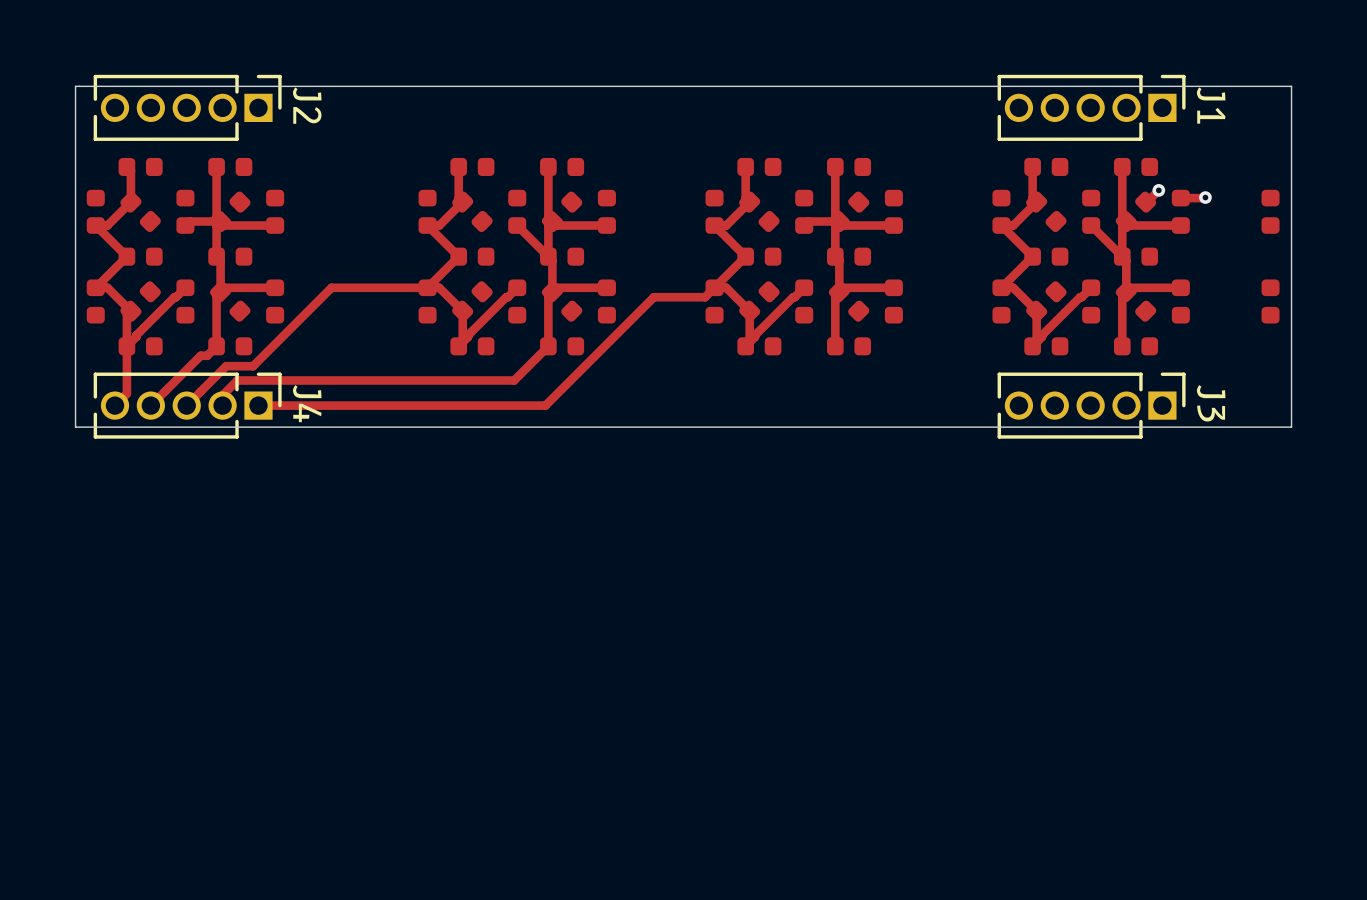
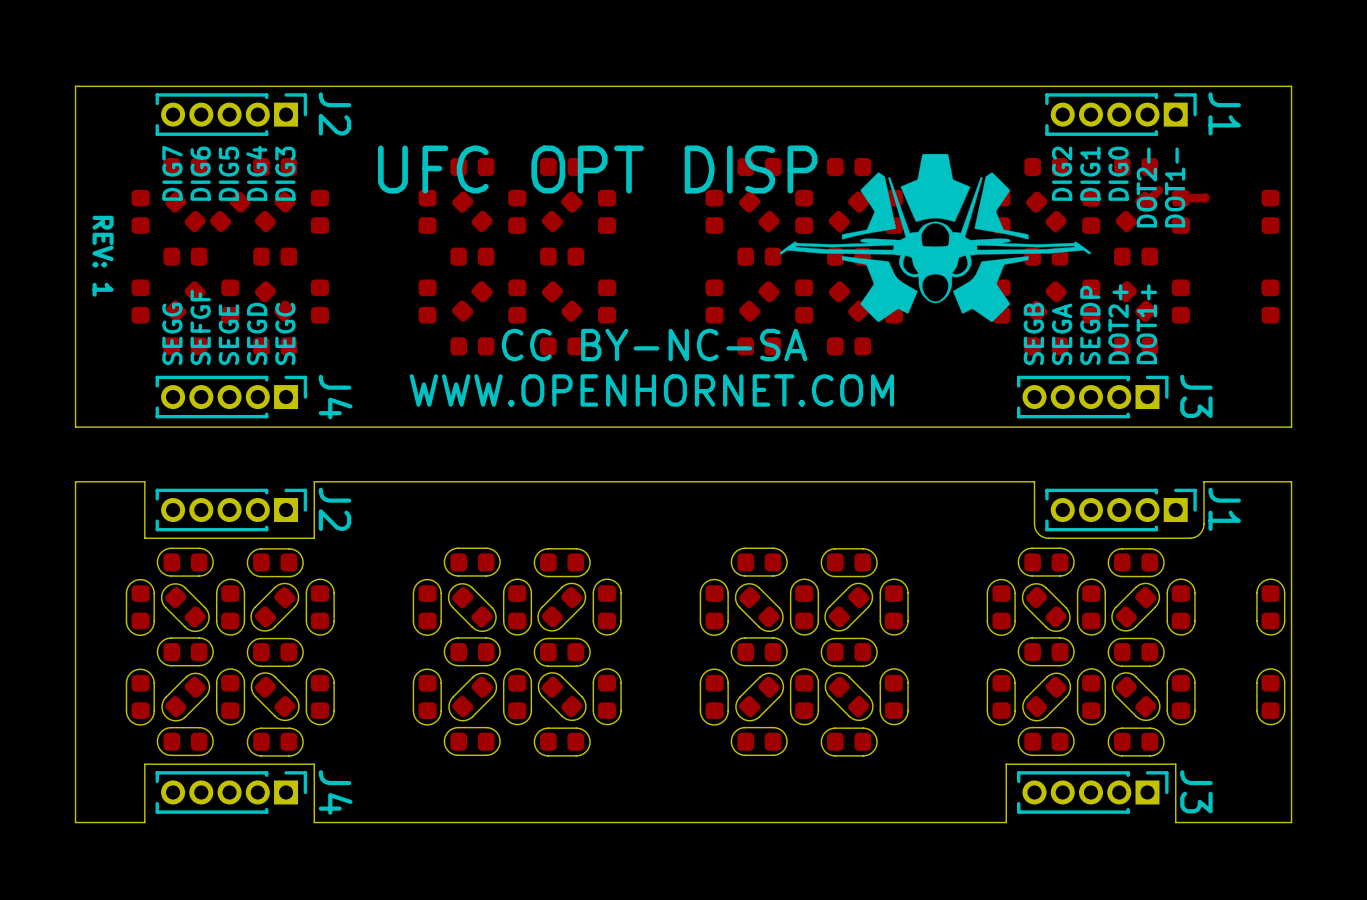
J2: (187, 107) -> none
J1: (1091, 107) -> none
J2: none -> (231, 114)
J1: none -> (1121, 114)
drawing: none -> [779, 153, 1091, 322]
top track: (126, 166) (130, 170) (130, 202) (107, 225) (95, 225) (126, 256) (95, 287) (107, 287) (130, 311) (126, 315) (126, 393) (114, 405) -> none
part: (140, 166) -> none
part: none -> (185, 166)
top track: (216, 166) (216, 217) (224, 225) (275, 225) -> none
part: (230, 166) -> none
part: none -> (275, 166)
top track: (458, 166) (458, 198) (462, 202) (439, 225) (427, 225) (458, 256) (427, 287) -> none
top track: (548, 166) (548, 217) (556, 225) (606, 225) -> none
top track: (745, 166) (745, 198) (749, 202) (726, 225) (714, 225) (745, 256) (705, 297) (653, 297) (545, 405) (258, 405) -> none
top track: (835, 166) (835, 217) (843, 225) (893, 225) -> none
top track: (1032, 166) (1032, 198) (1036, 202) (1013, 225) (1001, 225) (1032, 256) (1001, 287) (1013, 287) (1036, 311) (1036, 342) -> none
top track: (1122, 166) (1122, 217) (1130, 225) (1180, 225) -> none
text: none -> DIG6 (200, 173)
text: none -> DIG7 (172, 173)
text: none -> DIG5 (228, 173)
text: none -> DIG4 (256, 173)
text: none -> DIG3 (285, 173)
text: none -> DIG2 (1062, 173)
text: none -> DIG1 (1090, 173)
text: none -> DIG0 (1118, 173)
text: none -> UFC OPT DISP (597, 169)
text: none -> DOT2- (1146, 187)
text: none -> DOT1- (1175, 187)
via: (1158, 190) -> none
via: (1205, 197) -> none
part: (95, 211) -> none
part rotation: 0° (140, 211) -> 45° clockwise (140, 211)
part rotation: 0° (185, 211) -> 45° counterclockwise (185, 211)
part rotation: 0° (275, 211) -> 45° clockwise (275, 211)
part: none -> (319, 211)
top track: (552, 221) (548, 225) (548, 256) -> none
top track: (1126, 221) (1122, 225) (1122, 256) -> none
top track: (185, 225) (189, 221) (220, 221) (216, 225) (216, 256) (220, 260) (220, 291) -> none
top track: (517, 225) (552, 260) (552, 291) -> none
top track: (804, 225) (808, 221) (839, 221) (835, 225) (835, 256) (839, 260) (839, 291) -> none
top track: (1091, 225) (1126, 260) (1126, 291) -> none
text: none -> REV: 1 (103, 256)
part: (140, 256) -> none
part: none -> (185, 256)
part: (230, 256) -> none
part: none -> (275, 256)
top track: (185, 287) (126, 346) -> none
top track: (275, 287) (224, 287) (216, 295) (216, 346) (207, 355) (200, 355) (150, 405) -> none
top track: (517, 287) (458, 346) -> none
top track: (606, 287) (556, 287) (548, 295) (548, 346) (514, 380) (237, 380) (222, 395) (222, 405) -> none
top track: (714, 287) (726, 287) (749, 311) (749, 342) -> none
top track: (804, 287) (745, 346) -> none
top track: (893, 287) (843, 287) (835, 295) (835, 346) -> none
top track: (1091, 287) (1032, 346) -> none
top track: (1180, 287) (1130, 287) (1122, 295) (1122, 346) -> none
part: (95, 301) -> none
part rotation: 0° (140, 301) -> 45° counterclockwise (140, 301)
part rotation: 0° (185, 301) -> 45° clockwise (185, 301)
part rotation: 0° (230, 301) -> 45° clockwise (230, 301)
part rotation: 0° (275, 301) -> 45° counterclockwise (275, 301)
part: none -> (319, 301)
text: none -> DOT2+ (1118, 324)
text: none -> DOT1+ (1146, 324)
text: none -> SEGDP (1090, 325)
text: none -> SEFGF (200, 327)
text: none -> SEGG (172, 333)
text: none -> SEGD (257, 333)
text: none -> SEGB (1033, 333)
text: none -> SEGA (1062, 334)
text: none -> SEGE (228, 334)
text: none -> SEGC (285, 333)
top track: (462, 342) (462, 311) (439, 287) (331, 287) (253, 366) (226, 366) (186, 405) -> none
text: none -> CC BY-NC-SA (654, 345)
part: (140, 346) -> none
part: none -> (185, 346)
part: (230, 346) -> none
part: none -> (275, 346)
J3 footprint: [997, 372, 1186, 439] -> [1017, 375, 1169, 419]
text: none -> WWW.OPENHORNET.COM (651, 390)
J4: none -> (231, 397)
J3 name position: J3 (1211, 403) -> J3 (1196, 396)
J4: (187, 405) -> none
board edge: none -> (1291, 481) (1203, 481) (1203, 527) (1198, 535) (1189, 538) (1043, 537) (1037, 532) (1034, 525) (1034, 481) (314, 481) (314, 538) (144, 538) (144, 481) (75, 481) (75, 822) (144, 822) (144, 764) (314, 764) (314, 822) (1006, 822) (1006, 764) (1175, 764) (1175, 822) (1291, 822) (1291, 481)
J2: none -> (231, 510)
J1: none -> (1121, 510)
board edge: none -> (199, 548) (164, 550) (157, 558) (159, 569) (169, 575) (199, 576) (206, 574) (212, 567) (212, 558) (207, 551) (199, 548)
board edge: none -> (289, 548) (261, 548) (254, 550) (247, 559) (249, 569) (259, 576) (289, 576) (296, 574) (302, 568) (302, 559) (297, 551) (289, 548)
board edge: none -> (486, 548) (451, 550) (444, 558) (446, 569) (456, 575) (486, 575) (493, 574) (499, 567) (499, 558) (494, 551) (486, 548)
board edge: none -> (576, 548) (548, 548) (541, 550) (534, 559) (536, 569) (546, 576) (576, 576) (583, 574) (589, 567) (589, 559) (584, 551) (576, 548)
board edge: none -> (773, 548) (738, 550) (731, 558) (733, 569) (743, 575) (773, 575) (780, 574) (786, 567) (786, 558) (781, 551) (773, 548)
board edge: none -> (863, 548) (835, 548) (828, 550) (821, 559) (823, 569) (833, 576) (863, 576) (870, 574) (875, 567) (876, 559) (871, 551) (863, 548)
board edge: none -> (1060, 548) (1025, 550) (1018, 558) (1020, 569) (1030, 575) (1060, 575) (1067, 574) (1072, 567) (1073, 558) (1068, 551) (1060, 548)
board edge: none -> (1150, 548) (1122, 548) (1115, 550) (1108, 559) (1110, 569) (1120, 576) (1150, 576) (1157, 574) (1162, 567) (1163, 559) (1158, 551) (1150, 548)
part: none -> (185, 562)
part: none -> (275, 562)
part: none -> (472, 562)
part: none -> (562, 562)
part: none -> (759, 562)
part: none -> (849, 562)
part: none -> (1046, 562)
part: none -> (1136, 562)
board edge: none -> (185, 587) (208, 613) (207, 624) (198, 630) (186, 628) (165, 607) (162, 601) (162, 592) (168, 585) (177, 583) (185, 587)
board edge: none -> (274, 587) (251, 613) (252, 624) (261, 630) (273, 628) (294, 607) (298, 600) (297, 592) (291, 585) (282, 583) (274, 587)
board edge: none -> (472, 587) (495, 613) (494, 624) (485, 630) (473, 628) (452, 607) (449, 601) (449, 592) (455, 585) (464, 583) (472, 587)
board edge: none -> (561, 587) (538, 613) (539, 623) (548, 630) (560, 628) (581, 607) (585, 600) (584, 591) (578, 585) (569, 583) (561, 587)
board edge: none -> (759, 587) (782, 613) (781, 624) (772, 630) (760, 628) (739, 607) (736, 601) (736, 592) (742, 585) (751, 583) (759, 587)
board edge: none -> (848, 587) (825, 613) (826, 623) (835, 630) (847, 628) (868, 607) (872, 600) (871, 591) (865, 585) (856, 583) (848, 587)
board edge: none -> (1046, 587) (1069, 613) (1068, 624) (1059, 630) (1047, 628) (1026, 607) (1022, 601) (1023, 592) (1029, 585) (1038, 583) (1046, 587)
board edge: none -> (1135, 587) (1112, 613) (1113, 623) (1122, 630) (1134, 628) (1155, 607) (1158, 600) (1158, 591) (1152, 585) (1143, 583) (1135, 587)
board edge: none -> (154, 593) (152, 628) (143, 634) (133, 633) (126, 623) (126, 593) (128, 586) (135, 580) (143, 580) (151, 585) (154, 593)
board edge: none -> (244, 593) (242, 628) (234, 634) (223, 633) (216, 622) (216, 593) (218, 586) (225, 580) (234, 579) (241, 584) (244, 593)
board edge: none -> (334, 593) (332, 628) (323, 634) (313, 633) (306, 622) (306, 593) (308, 586) (314, 580) (323, 579) (331, 584) (334, 593)
board edge: none -> (441, 593) (439, 628) (430, 634) (420, 633) (413, 623) (413, 593) (415, 586) (421, 580) (430, 580) (438, 584) (441, 593)
board edge: none -> (531, 593) (529, 627) (521, 634) (510, 633) (503, 622) (503, 593) (505, 586) (512, 580) (521, 579) (528, 584) (531, 593)
board edge: none -> (621, 593) (619, 627) (610, 634) (600, 633) (593, 622) (593, 593) (595, 586) (601, 580) (610, 579) (618, 584) (621, 593)
board edge: none -> (728, 593) (726, 628) (717, 634) (707, 633) (700, 623) (700, 593) (702, 586) (708, 580) (717, 580) (725, 584) (728, 593)
board edge: none -> (818, 593) (816, 627) (808, 634) (797, 633) (790, 622) (790, 593) (792, 586) (799, 580) (808, 579) (815, 584) (818, 593)
board edge: none -> (908, 593) (906, 627) (897, 634) (887, 633) (880, 622) (880, 593) (882, 586) (888, 580) (897, 579) (905, 584) (908, 593)
board edge: none -> (1015, 593) (1013, 628) (1004, 634) (994, 633) (987, 623) (987, 593) (989, 586) (995, 580) (1004, 580) (1012, 584) (1015, 593)
board edge: none -> (1105, 593) (1103, 627) (1095, 634) (1084, 633) (1077, 622) (1077, 593) (1079, 586) (1086, 580) (1095, 579) (1102, 584) (1105, 593)
board edge: none -> (1194, 593) (1193, 627) (1184, 634) (1174, 633) (1167, 622) (1167, 593) (1169, 586) (1175, 580) (1184, 579) (1192, 584) (1194, 593)
board edge: none -> (1284, 593) (1282, 627) (1274, 634) (1263, 633) (1257, 622) (1256, 593) (1258, 586) (1265, 580) (1274, 579) (1281, 584) (1284, 593)
part: none -> (140, 607)
part: none -> (185, 607)
part: none -> (230, 607)
part: none -> (275, 607)
part: none -> (319, 607)
part: none -> (427, 607)
part: none -> (472, 607)
part: none -> (517, 607)
part: none -> (562, 607)
part: none -> (606, 607)
part: none -> (714, 607)
part: none -> (759, 607)
part: none -> (804, 607)
part: none -> (849, 607)
part: none -> (893, 607)
part: none -> (1001, 607)
part: none -> (1046, 607)
part: none -> (1091, 607)
part: none -> (1136, 607)
part: none -> (1180, 607)
part: none -> (1270, 607)
board edge: none -> (486, 637) (451, 639) (444, 648) (446, 658) (456, 665) (486, 665) (493, 663) (499, 657) (499, 648) (494, 640) (486, 637)
board edge: none -> (773, 637) (738, 639) (731, 648) (733, 658) (743, 665) (773, 665) (780, 663) (786, 657) (786, 648) (781, 640) (773, 637)
board edge: none -> (1060, 637) (1025, 639) (1018, 648) (1020, 658) (1030, 665) (1060, 665) (1067, 663) (1072, 657) (1073, 648) (1068, 640) (1060, 637)
board edge: none -> (199, 638) (164, 639) (157, 648) (159, 658) (169, 665) (199, 665) (206, 663) (212, 657) (212, 648) (207, 640) (199, 638)
board edge: none -> (289, 638) (261, 638) (254, 640) (247, 648) (249, 659) (259, 666) (289, 666) (296, 664) (302, 657) (302, 648) (297, 641) (289, 638)
board edge: none -> (576, 638) (548, 638) (541, 640) (534, 648) (536, 659) (546, 666) (576, 666) (583, 664) (589, 657) (589, 648) (584, 641) (576, 638)
board edge: none -> (863, 638) (835, 638) (828, 640) (821, 648) (823, 659) (833, 666) (863, 666) (870, 664) (875, 657) (876, 648) (871, 641) (863, 638)
board edge: none -> (1150, 638) (1122, 638) (1115, 640) (1108, 648) (1110, 659) (1120, 666) (1150, 666) (1157, 664) (1162, 657) (1163, 648) (1158, 641) (1150, 638)
part: none -> (185, 652)
part: none -> (275, 652)
part: none -> (472, 652)
part: none -> (562, 652)
part: none -> (759, 652)
part: none -> (849, 652)
part: none -> (1046, 652)
part: none -> (1136, 652)
board edge: none -> (562, 676) (585, 702) (584, 713) (575, 719) (563, 717) (542, 696) (538, 690) (539, 681) (545, 674) (554, 672) (562, 676)
board edge: none -> (849, 676) (872, 702) (871, 713) (862, 719) (850, 717) (829, 696) (825, 690) (826, 681) (832, 674) (841, 672) (849, 676)
board edge: none -> (1136, 676) (1159, 702) (1157, 713) (1149, 719) (1137, 717) (1116, 696) (1112, 690) (1113, 681) (1119, 674) (1128, 672) (1136, 676)
board edge: none -> (185, 677) (166, 697) (162, 703) (163, 713) (172, 720) (184, 717) (205, 696) (209, 690) (208, 681) (202, 675) (193, 673) (185, 677)
board edge: none -> (275, 677) (298, 702) (297, 713) (288, 719) (276, 717) (255, 696) (251, 690) (252, 681) (258, 674) (267, 673) (275, 676)
board edge: none -> (472, 677) (453, 697) (449, 703) (450, 713) (459, 720) (471, 717) (492, 696) (495, 690) (495, 681) (489, 675) (480, 673) (472, 677)
board edge: none -> (759, 677) (739, 697) (736, 703) (737, 713) (746, 720) (758, 717) (779, 696) (782, 690) (782, 681) (776, 675) (767, 673) (759, 677)
board edge: none -> (1046, 677) (1026, 697) (1023, 703) (1024, 713) (1033, 720) (1045, 717) (1066, 696) (1069, 690) (1069, 681) (1063, 675) (1054, 673) (1046, 677)
board edge: none -> (244, 682) (242, 717) (234, 724) (223, 722) (216, 712) (216, 682) (218, 675) (225, 670) (234, 669) (241, 674) (244, 682)
board edge: none -> (334, 682) (332, 717) (323, 724) (313, 722) (306, 712) (306, 682) (308, 675) (314, 670) (323, 669) (331, 674) (334, 682)
board edge: none -> (531, 682) (529, 717) (521, 724) (510, 722) (503, 712) (503, 682) (505, 675) (512, 669) (521, 669) (528, 674) (531, 682)
board edge: none -> (621, 682) (619, 717) (610, 724) (600, 722) (593, 712) (593, 682) (595, 675) (601, 669) (610, 669) (618, 674) (621, 682)
board edge: none -> (818, 682) (816, 717) (808, 724) (797, 722) (790, 712) (790, 682) (792, 675) (799, 669) (808, 669) (815, 674) (818, 682)
board edge: none -> (908, 682) (906, 717) (897, 724) (887, 722) (880, 712) (880, 682) (882, 675) (888, 669) (897, 669) (905, 674) (908, 682)
board edge: none -> (1105, 682) (1103, 717) (1095, 724) (1084, 722) (1077, 712) (1077, 682) (1079, 675) (1086, 669) (1095, 669) (1102, 674) (1105, 682)
board edge: none -> (1194, 682) (1193, 717) (1184, 724) (1174, 722) (1167, 712) (1167, 682) (1169, 675) (1175, 669) (1184, 669) (1192, 674) (1194, 682)
board edge: none -> (1284, 682) (1282, 717) (1274, 724) (1263, 722) (1257, 712) (1256, 682) (1258, 675) (1265, 669) (1274, 669) (1281, 674) (1284, 682)
board edge: none -> (154, 683) (152, 718) (143, 724) (133, 723) (126, 712) (126, 683) (128, 676) (135, 670) (143, 669) (151, 674) (154, 683)
board edge: none -> (441, 683) (439, 717) (430, 724) (420, 723) (413, 712) (413, 683) (415, 676) (421, 670) (430, 669) (438, 674) (441, 683)
board edge: none -> (728, 683) (726, 717) (717, 724) (707, 723) (700, 712) (700, 683) (702, 676) (708, 670) (717, 669) (725, 674) (728, 683)
board edge: none -> (1015, 683) (1013, 717) (1004, 724) (994, 723) (987, 712) (987, 683) (989, 676) (995, 670) (1004, 669) (1012, 674) (1015, 683)
part: none -> (140, 696)
part: none -> (185, 696)
part: none -> (230, 696)
part: none -> (275, 696)
part: none -> (319, 696)
part: none -> (427, 696)
part: none -> (472, 696)
part: none -> (517, 696)
part: none -> (562, 696)
part: none -> (606, 696)
part: none -> (714, 696)
part: none -> (759, 696)
part: none -> (804, 696)
part: none -> (849, 696)
part: none -> (893, 696)
part: none -> (1001, 696)
part: none -> (1046, 696)
part: none -> (1091, 696)
part: none -> (1136, 696)
part: none -> (1180, 696)
part: none -> (1270, 696)
board edge: none -> (199, 727) (164, 729) (157, 737) (159, 748) (169, 755) (199, 755) (206, 753) (212, 746) (212, 737) (207, 730) (199, 727)
board edge: none -> (486, 727) (451, 729) (444, 737) (446, 748) (456, 755) (486, 755) (493, 753) (499, 746) (499, 737) (494, 730) (486, 727)
board edge: none -> (773, 727) (738, 729) (731, 737) (733, 748) (743, 755) (773, 755) (780, 753) (786, 746) (786, 737) (781, 730) (773, 727)
board edge: none -> (1060, 727) (1025, 729) (1018, 737) (1020, 748) (1030, 755) (1060, 755) (1067, 753) (1072, 746) (1073, 737) (1068, 730) (1060, 727)
board edge: none -> (289, 728) (261, 728) (254, 730) (247, 738) (249, 749) (259, 755) (289, 755) (296, 754) (302, 747) (302, 738) (297, 731) (289, 728)
board edge: none -> (576, 728) (548, 728) (541, 730) (534, 738) (536, 748) (546, 755) (576, 755) (583, 754) (589, 747) (589, 738) (584, 731) (576, 728)
board edge: none -> (863, 728) (835, 728) (828, 730) (821, 738) (823, 748) (833, 755) (863, 755) (870, 754) (875, 747) (876, 738) (871, 731) (863, 728)
board edge: none -> (1150, 728) (1122, 728) (1115, 730) (1108, 738) (1110, 748) (1120, 755) (1150, 755) (1157, 754) (1162, 747) (1163, 738) (1158, 731) (1150, 728)
part: none -> (185, 741)
part: none -> (275, 741)
part: none -> (472, 741)
part: none -> (562, 741)
part: none -> (759, 741)
part: none -> (849, 741)
part: none -> (1046, 741)
part: none -> (1136, 741)
J4: none -> (231, 792)
J3: none -> (1092, 792)

